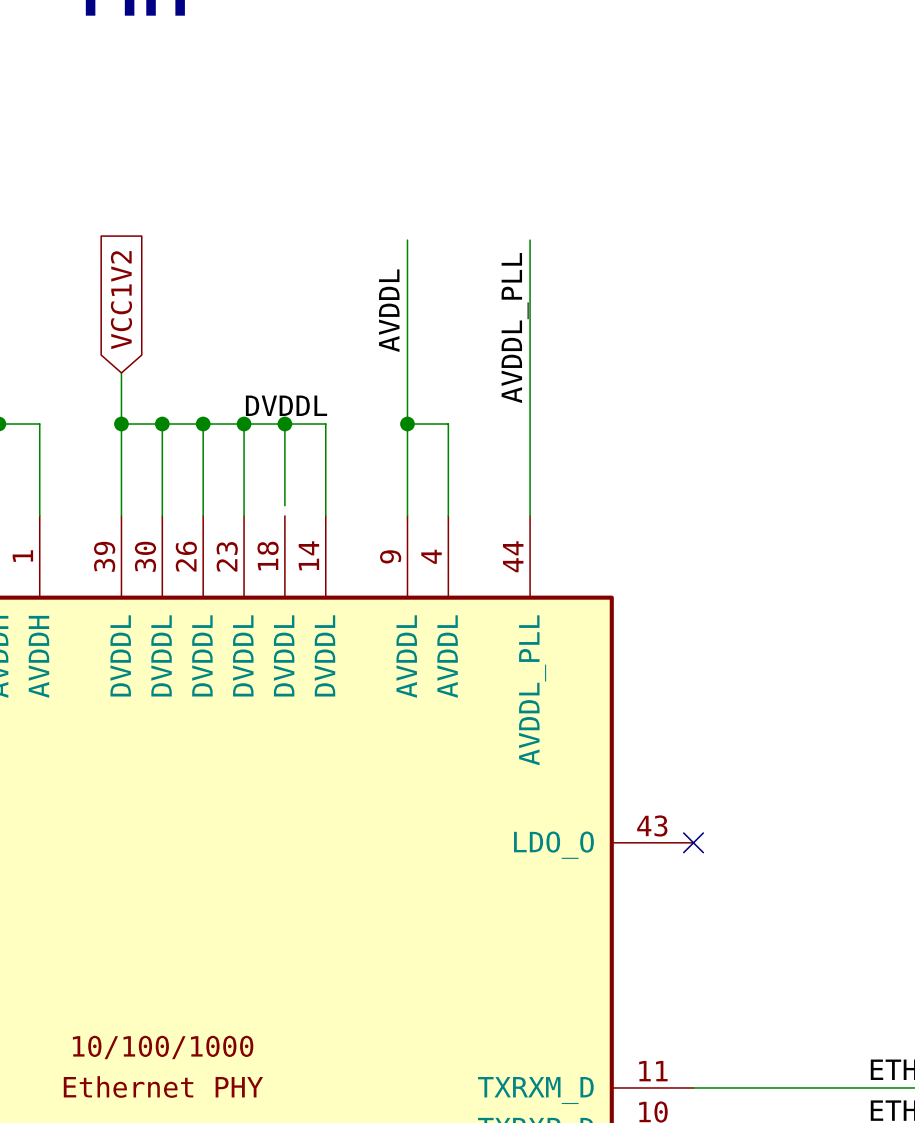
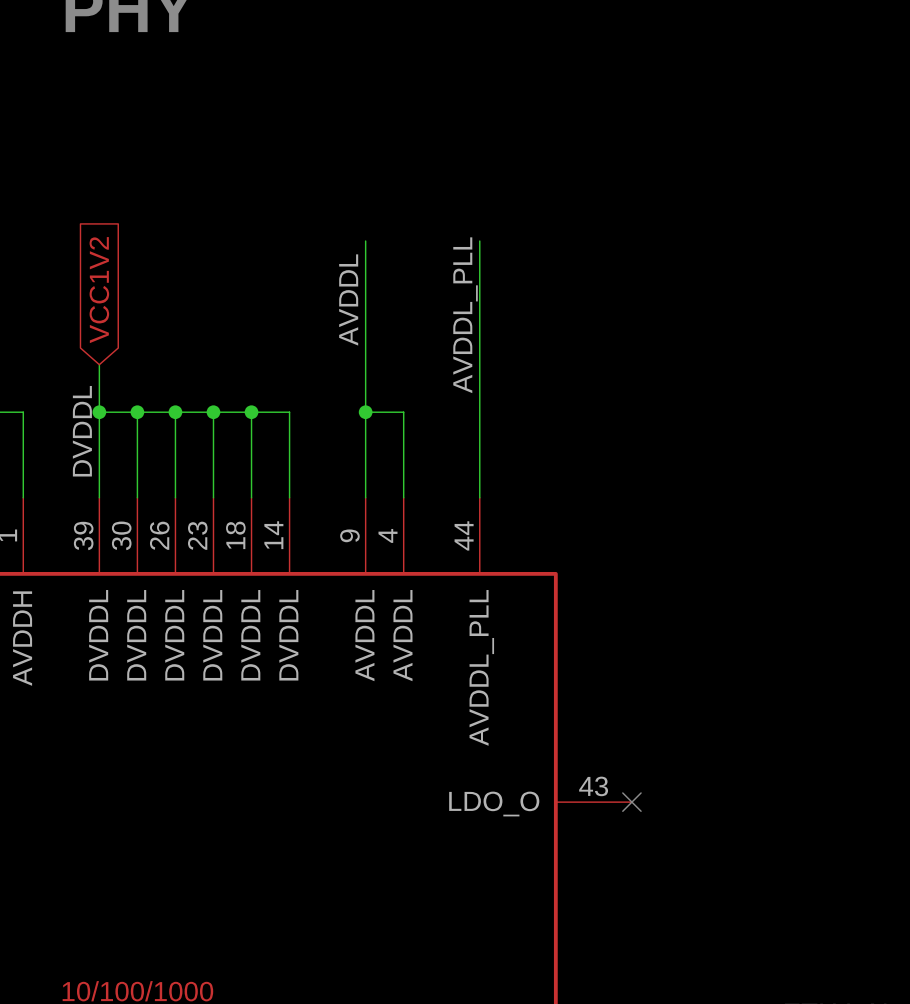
label rotation: 0° (286, 405) -> 90° counterclockwise (82, 431)
label position: DVDDL (286, 405) -> DVDDL (82, 431)
wire: none -> (251, 488) (251, 497)

